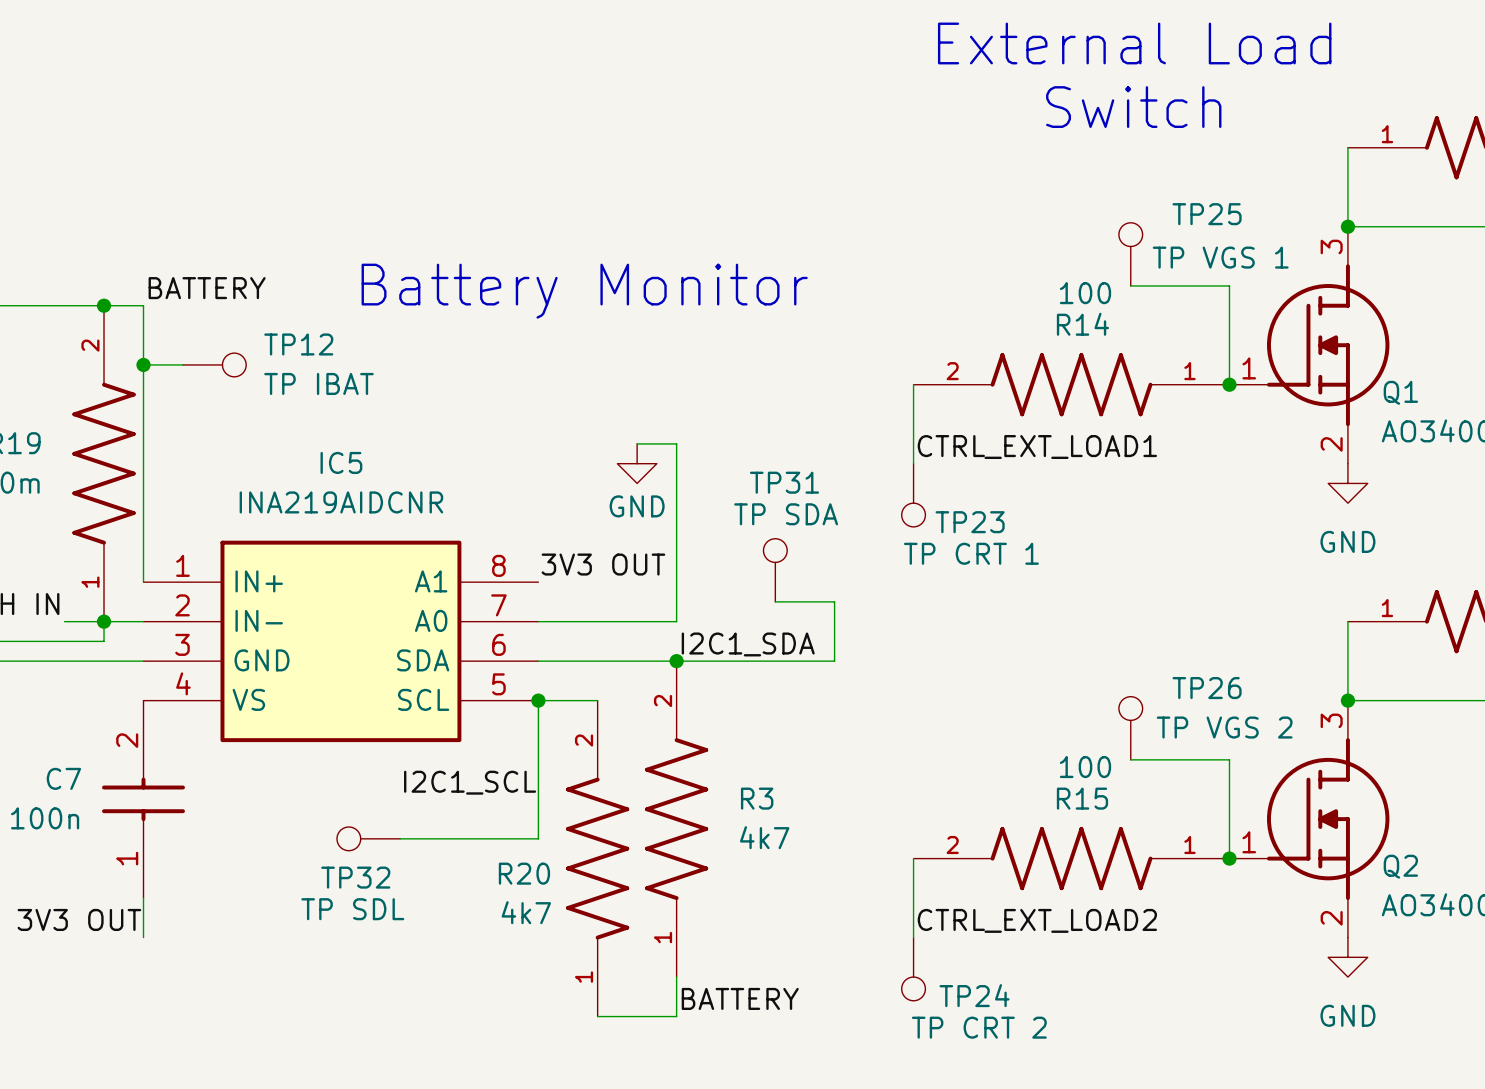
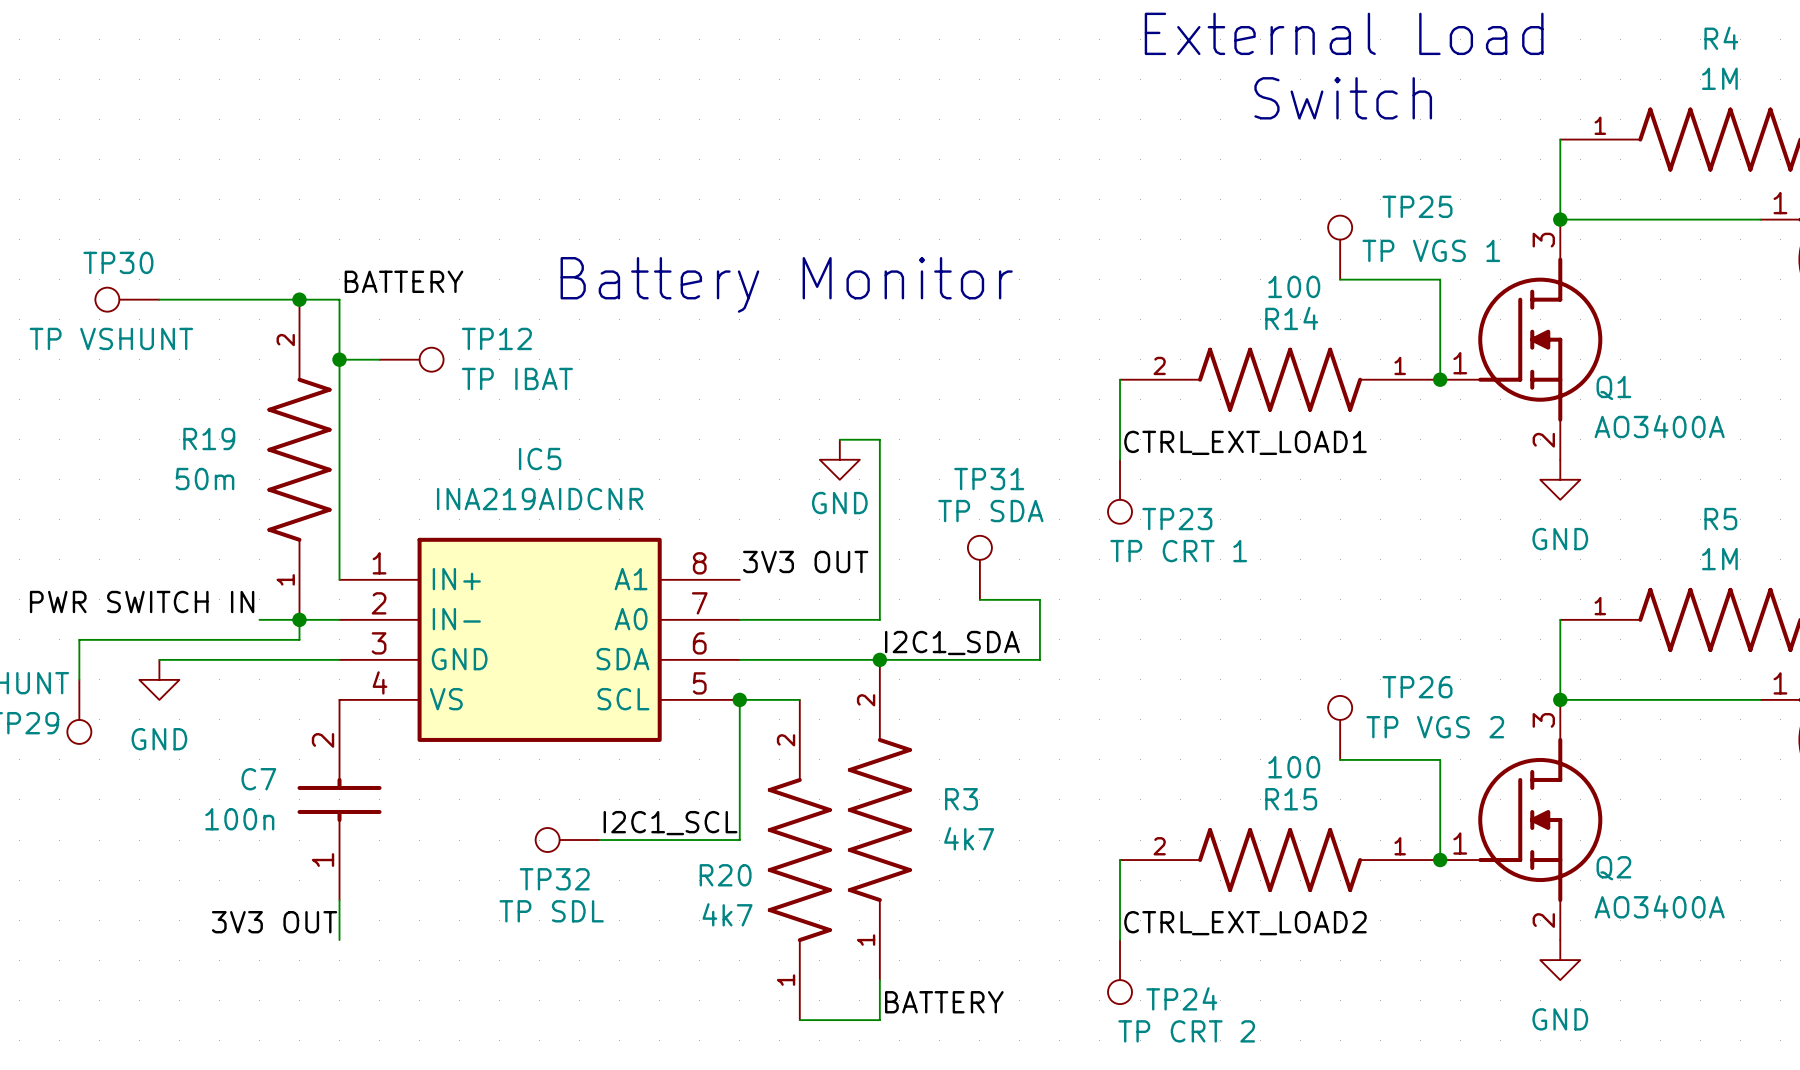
label position: I2C1_SCL (470, 782) -> I2C1_SCL (670, 823)

